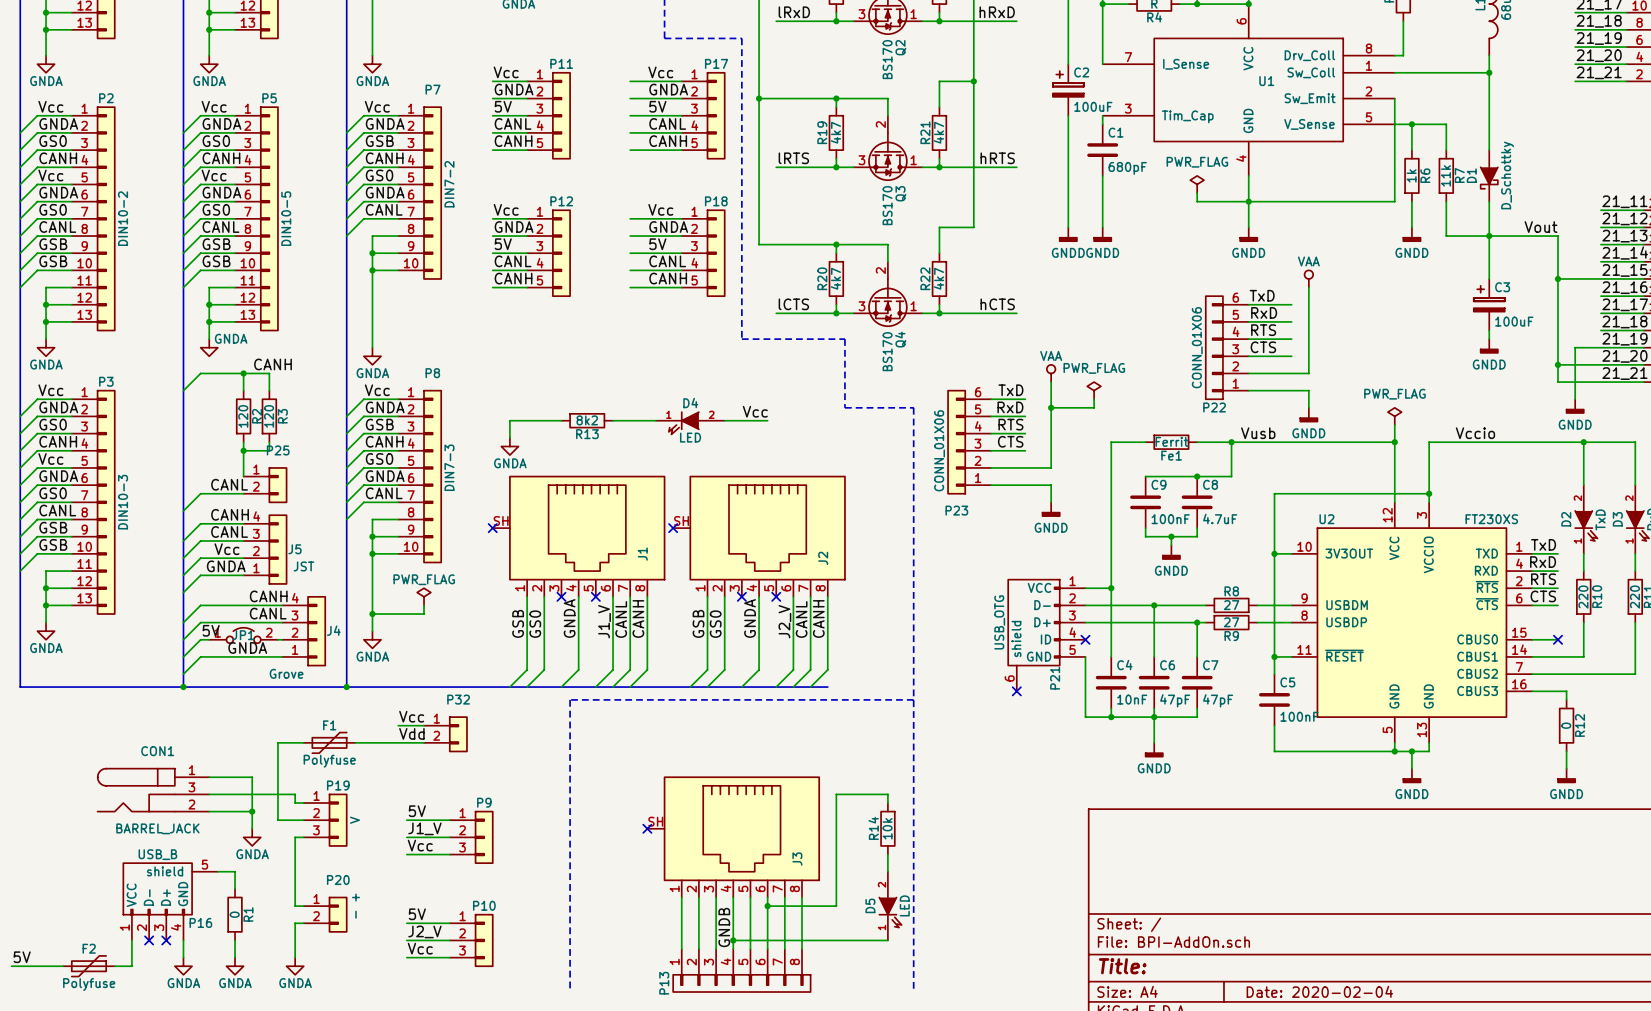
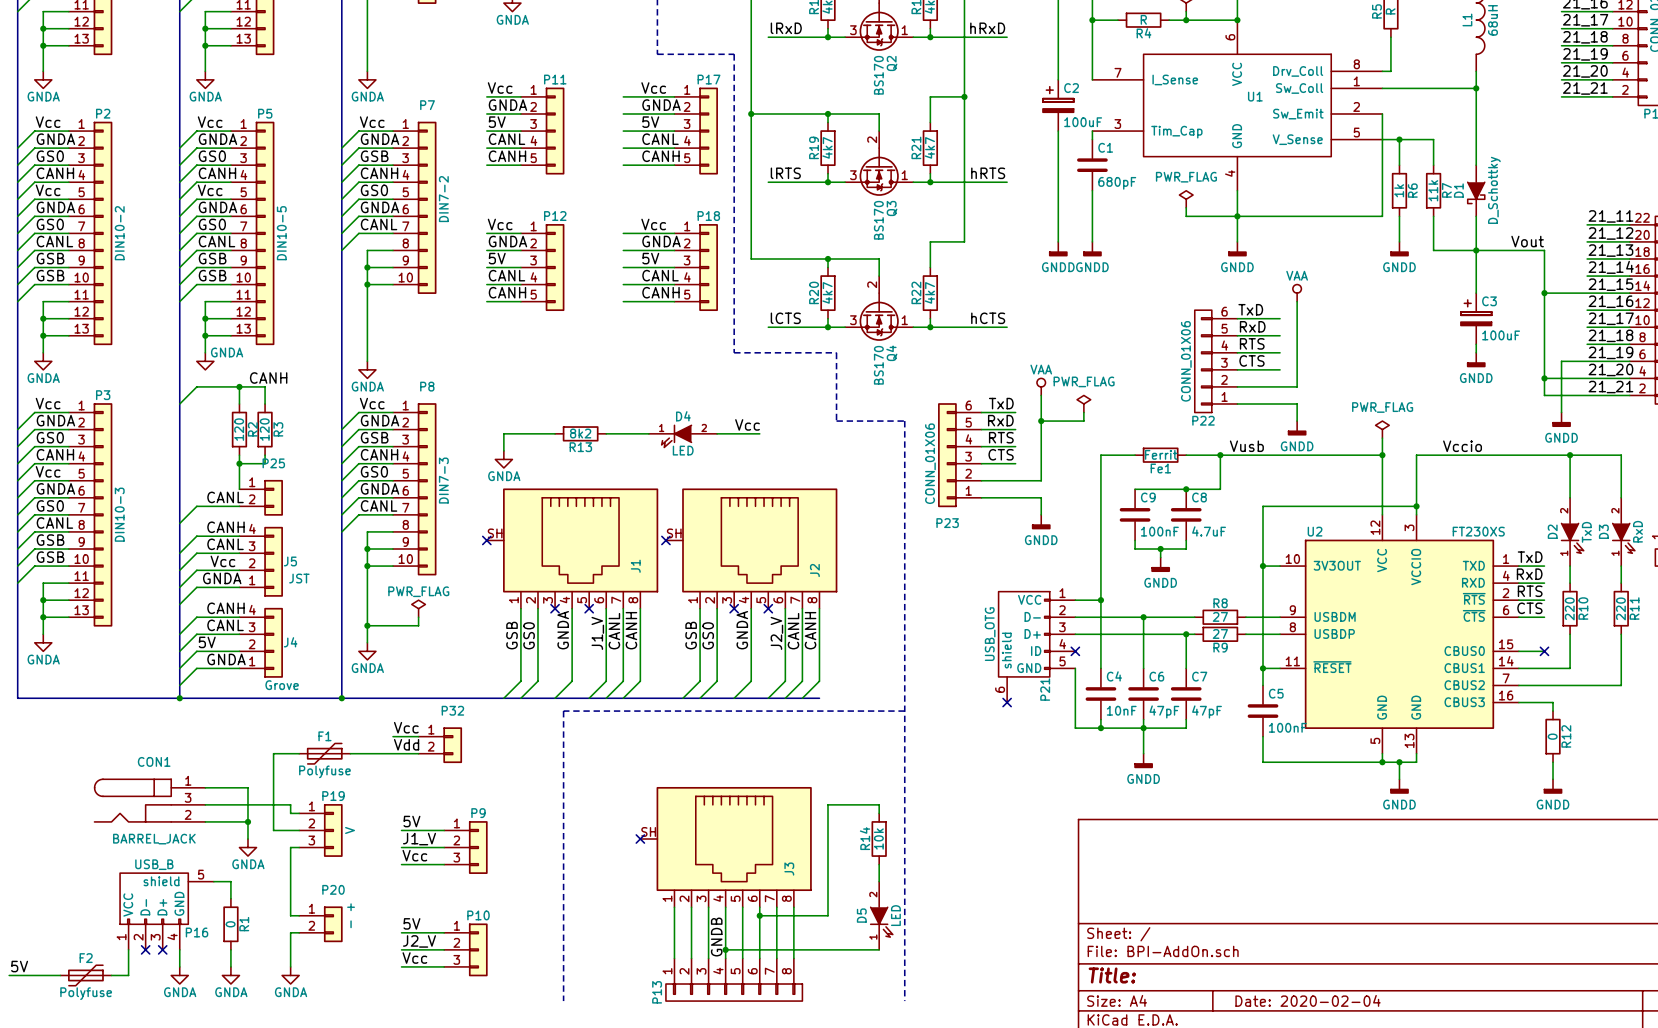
label position: CANH (268, 596) -> CANH (226, 608)
label position: CANL (268, 613) -> CANL (225, 625)
J4 position: (304, 631) -> (261, 642)
JP1: (243, 635) -> none
label position: GNDA (247, 647) -> GNDA (226, 659)

